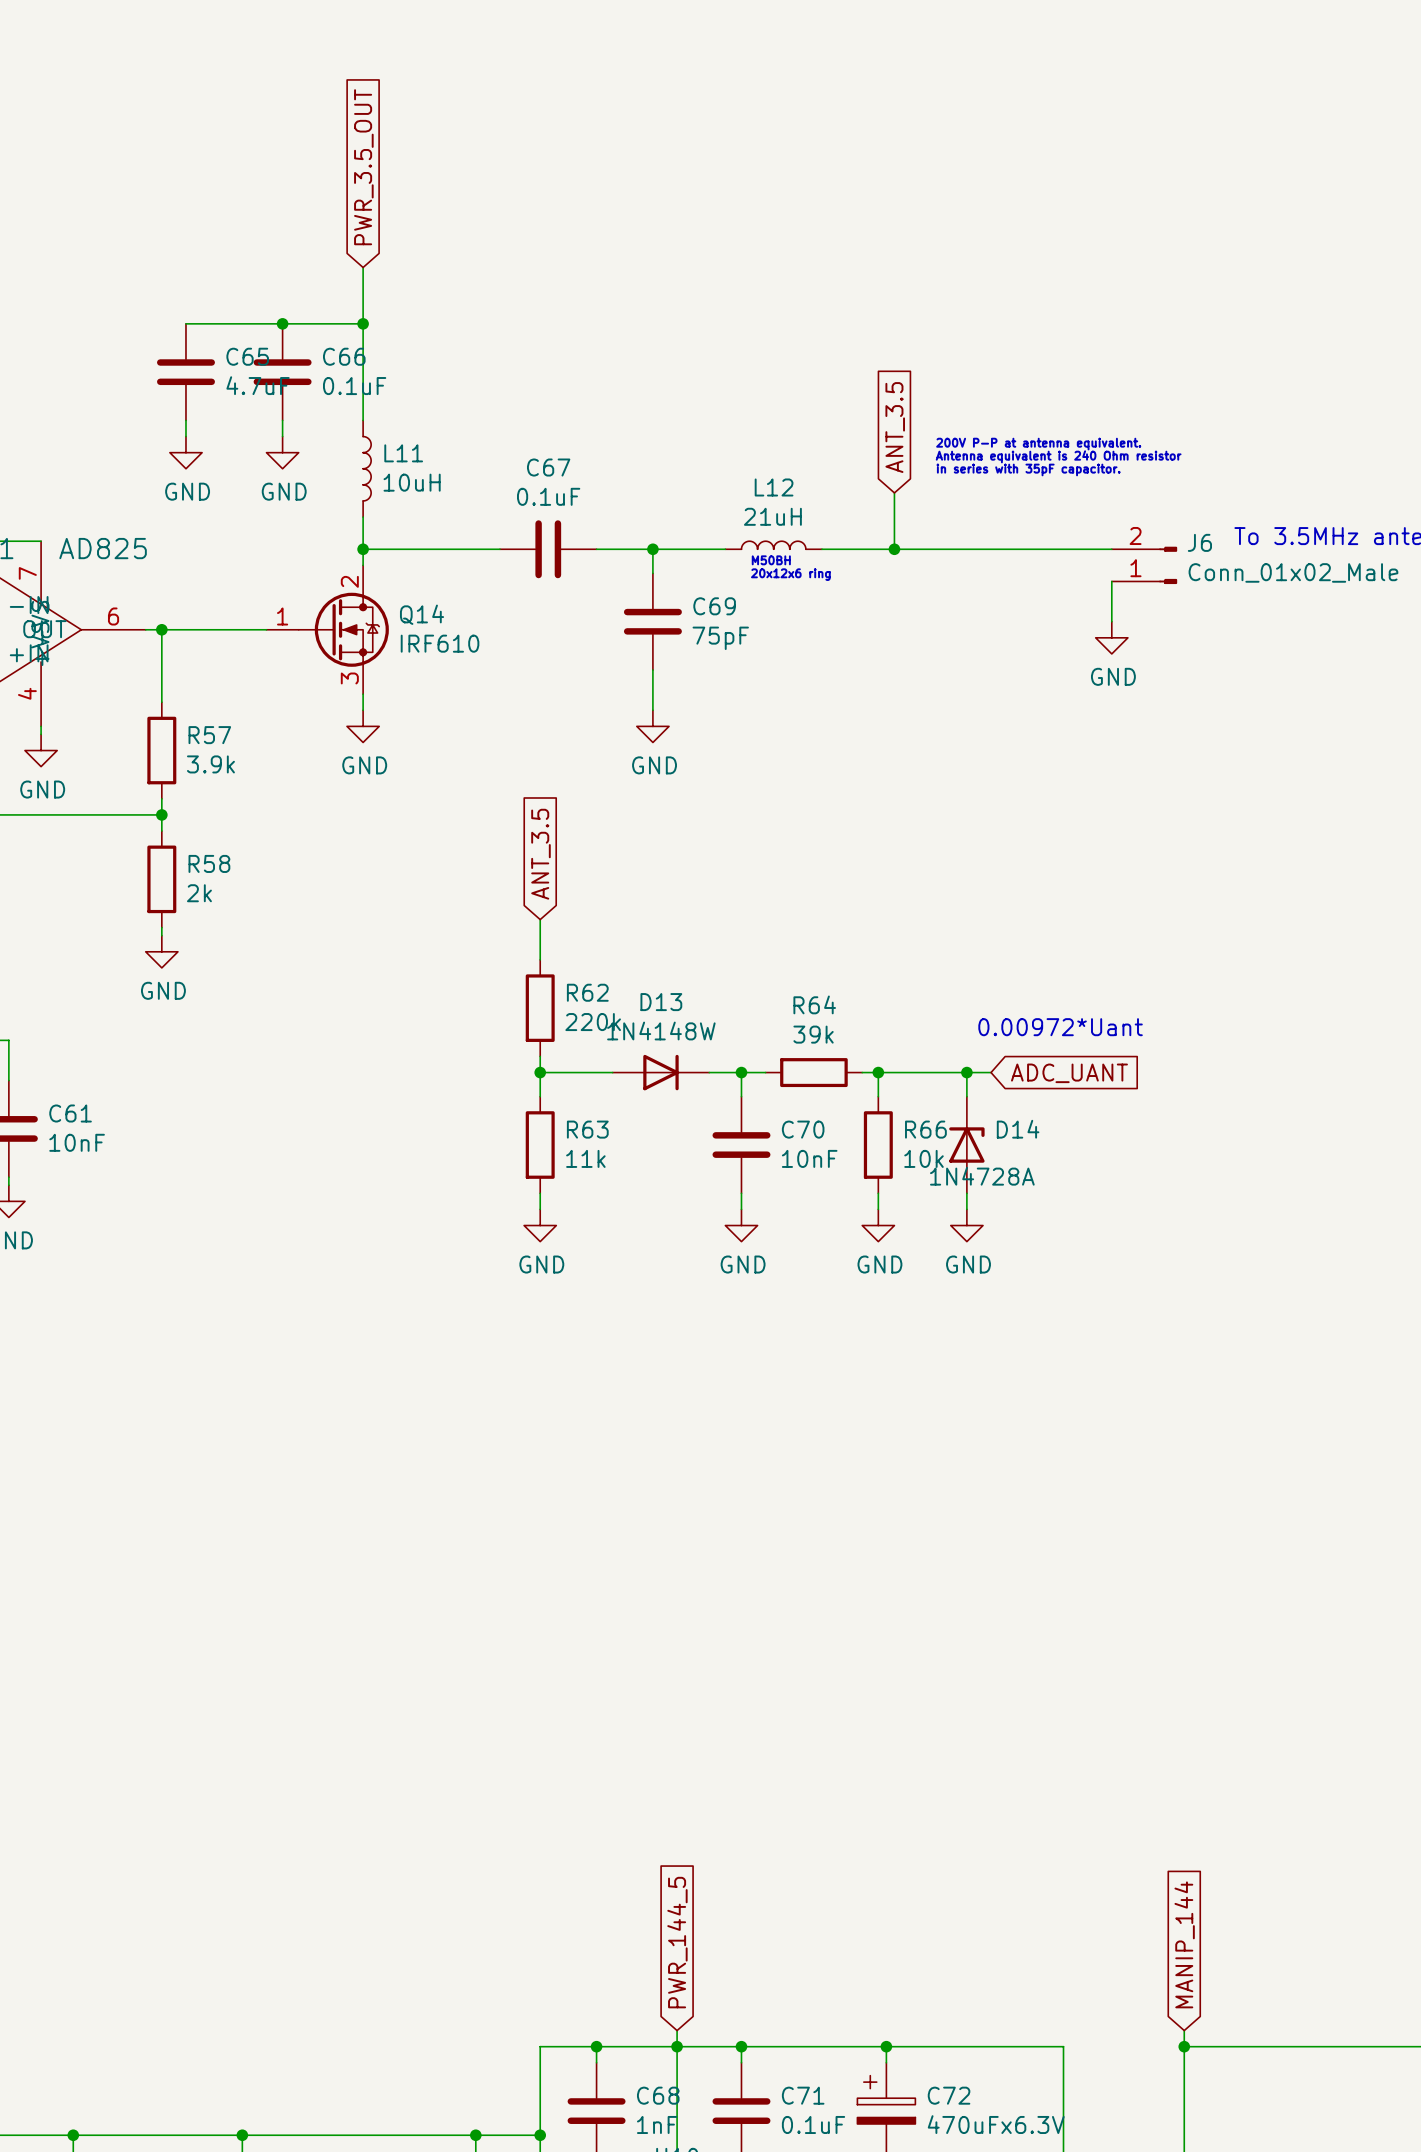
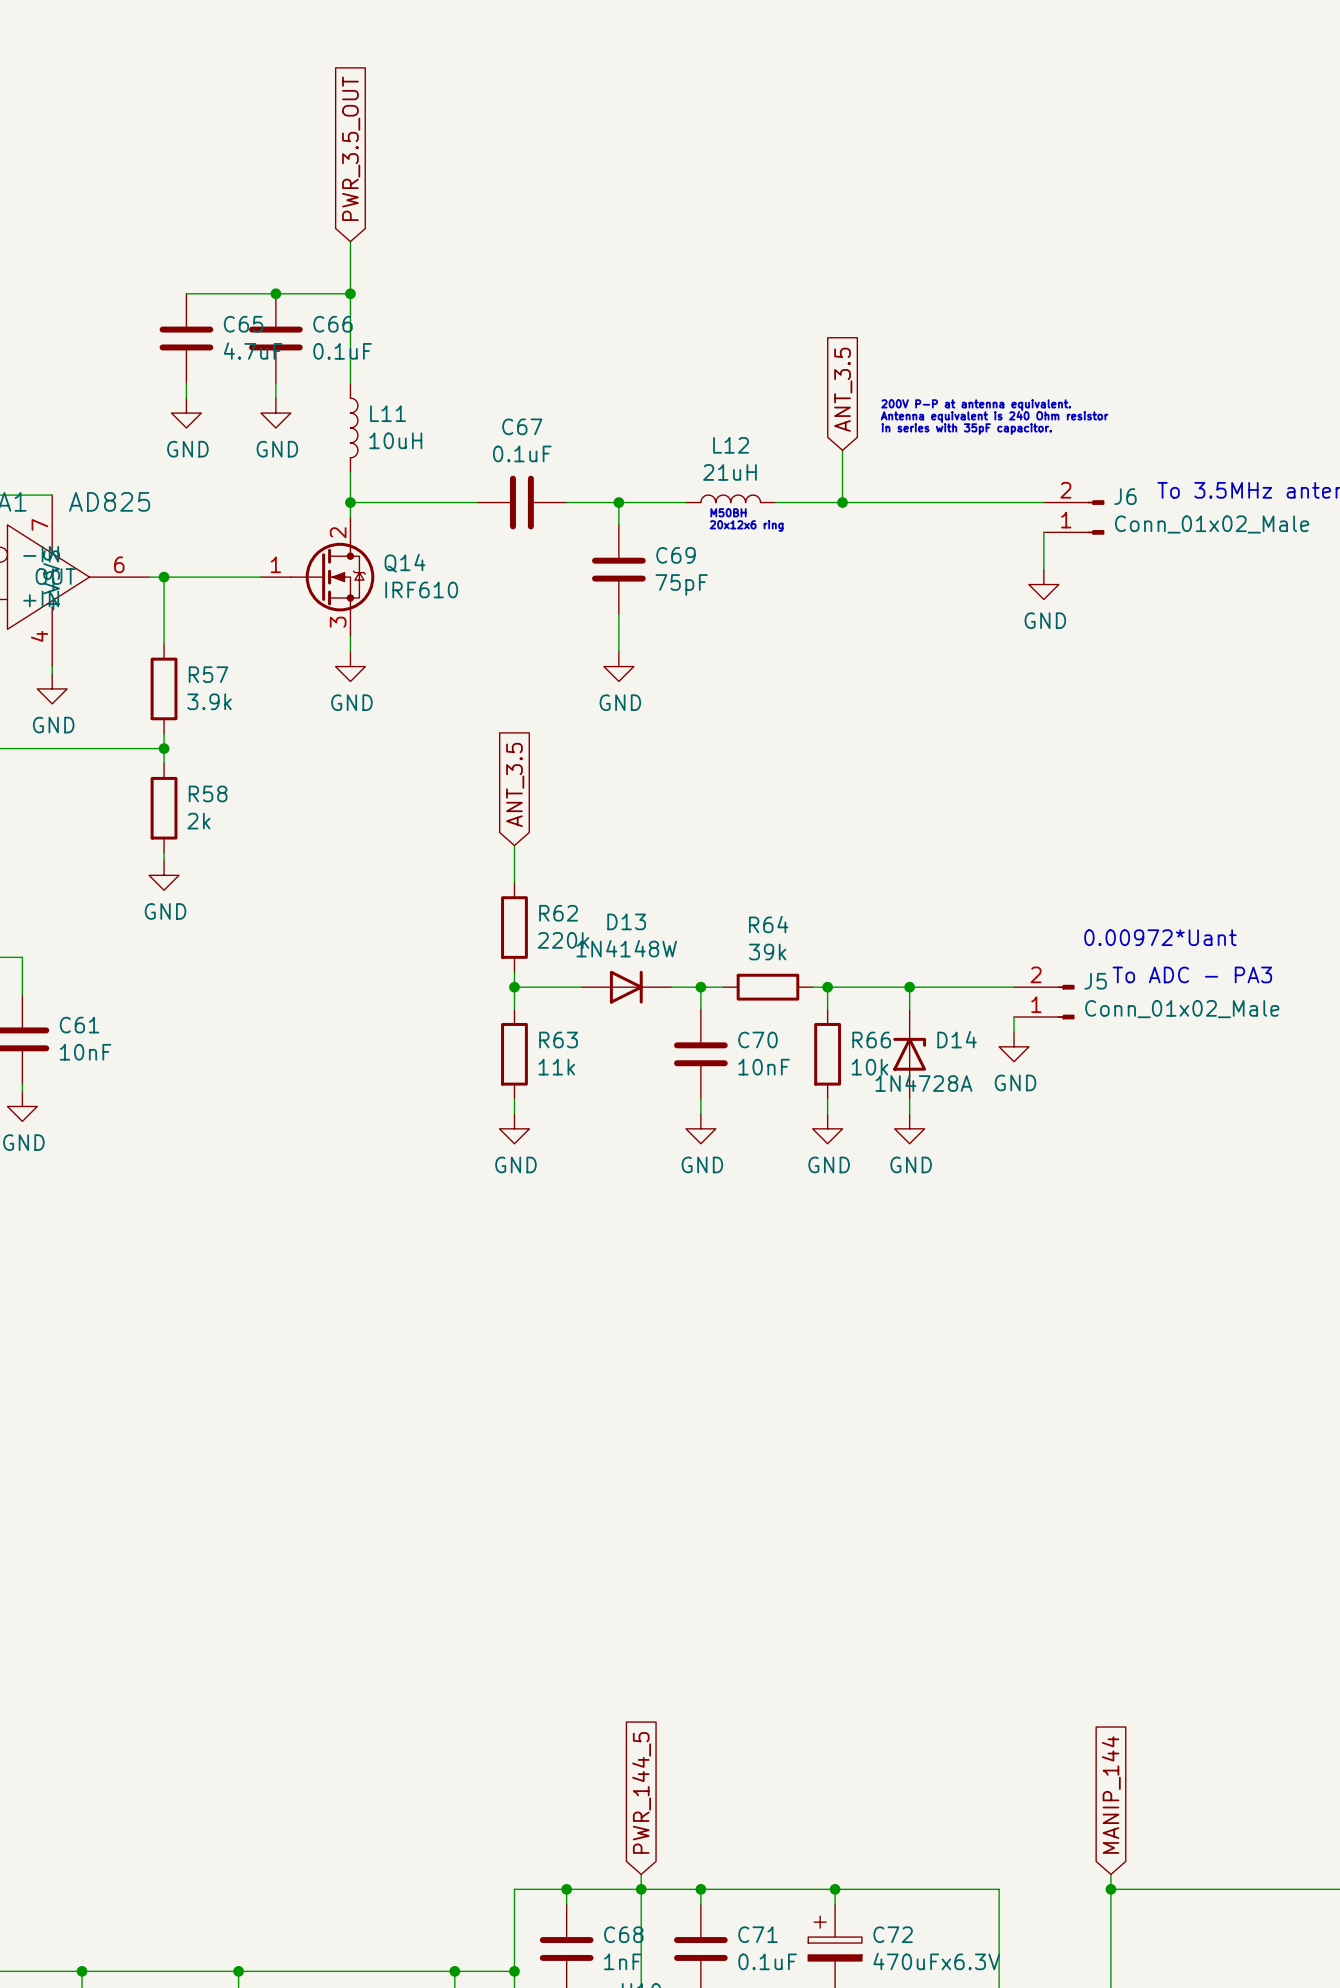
text position: 0.00972*Uant (1060, 1027) -> 0.00972*Uant (1160, 937)
text: none -> To ADC - PA3 (1192, 974)
wire: none -> (932, 987) (1014, 987)
global label: ADC_UANT (1069, 1073) -> none
J5: none -> Conn_01x02_Male (1044, 1002)
wire: none -> (1014, 1017) (1014, 1031)
power symbol: none -> GND (1014, 1046)

